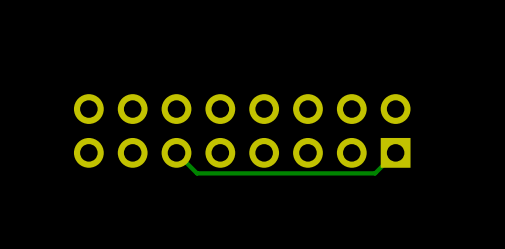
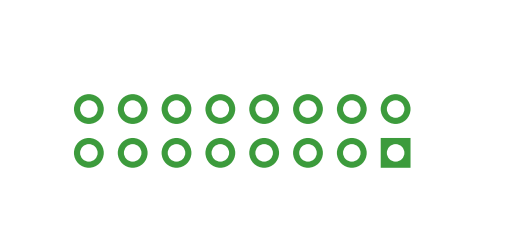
track: (395, 152) (375, 173) (197, 173) (176, 152) -> none

